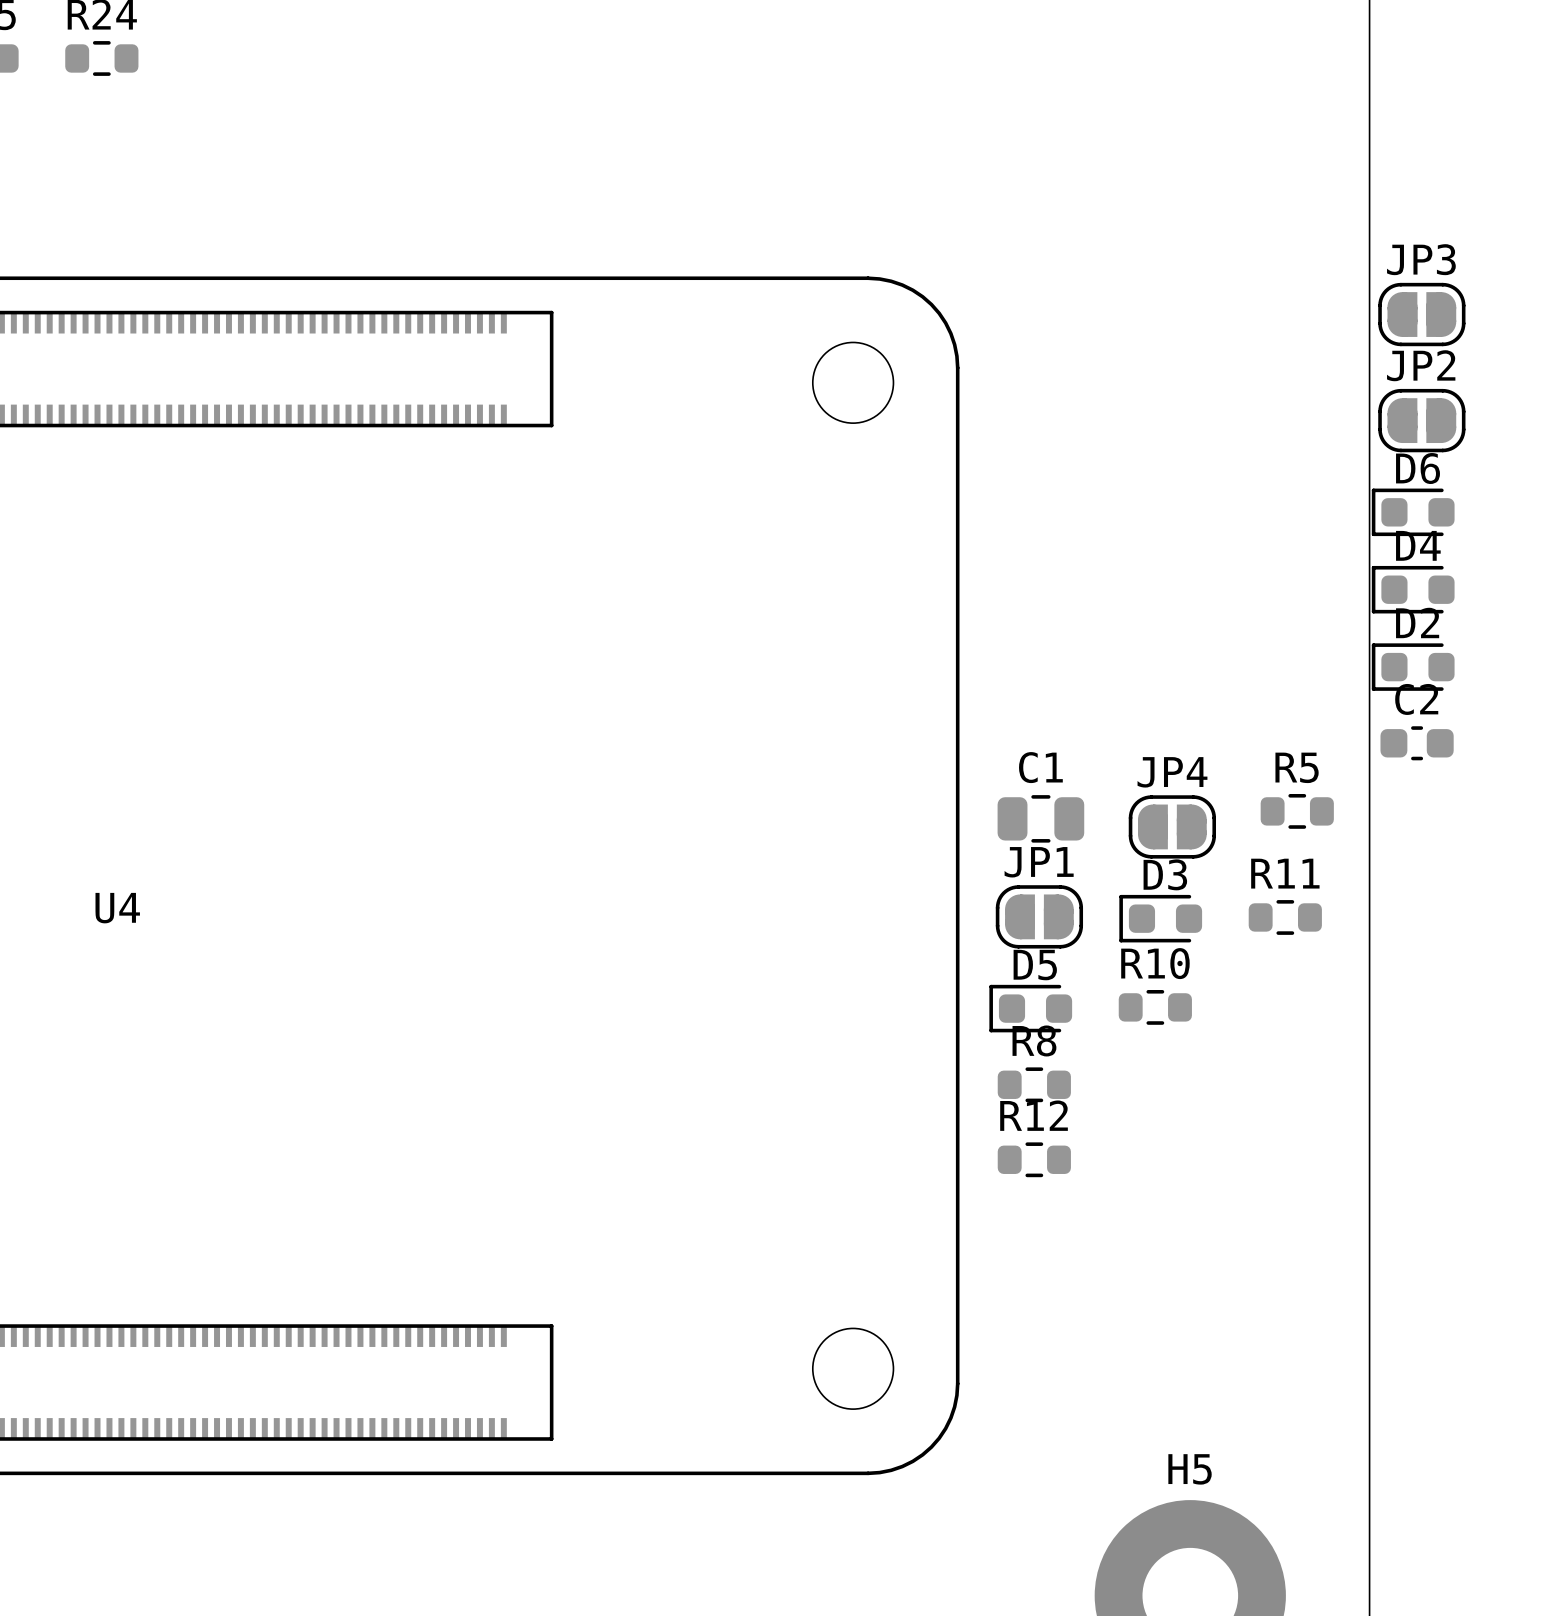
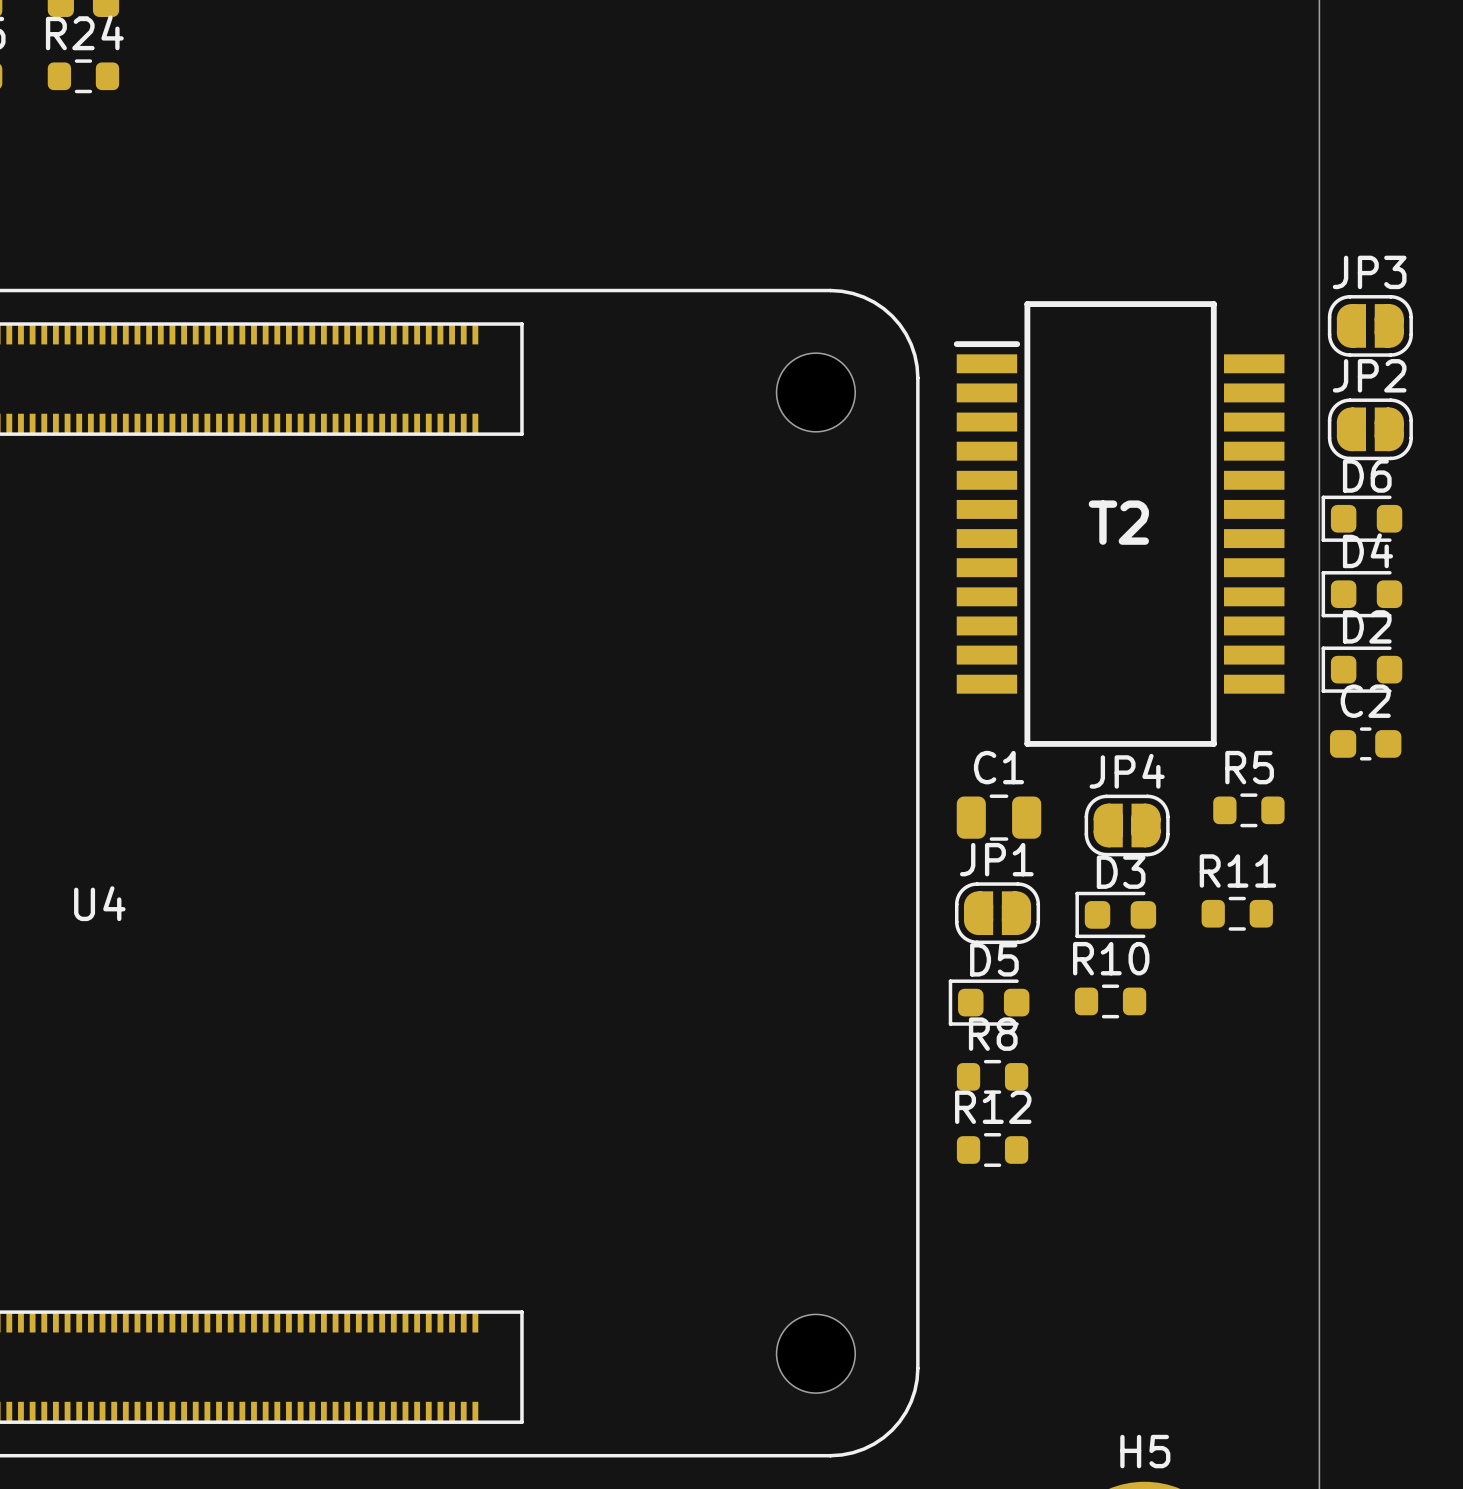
T2: none -> (1119, 524)

